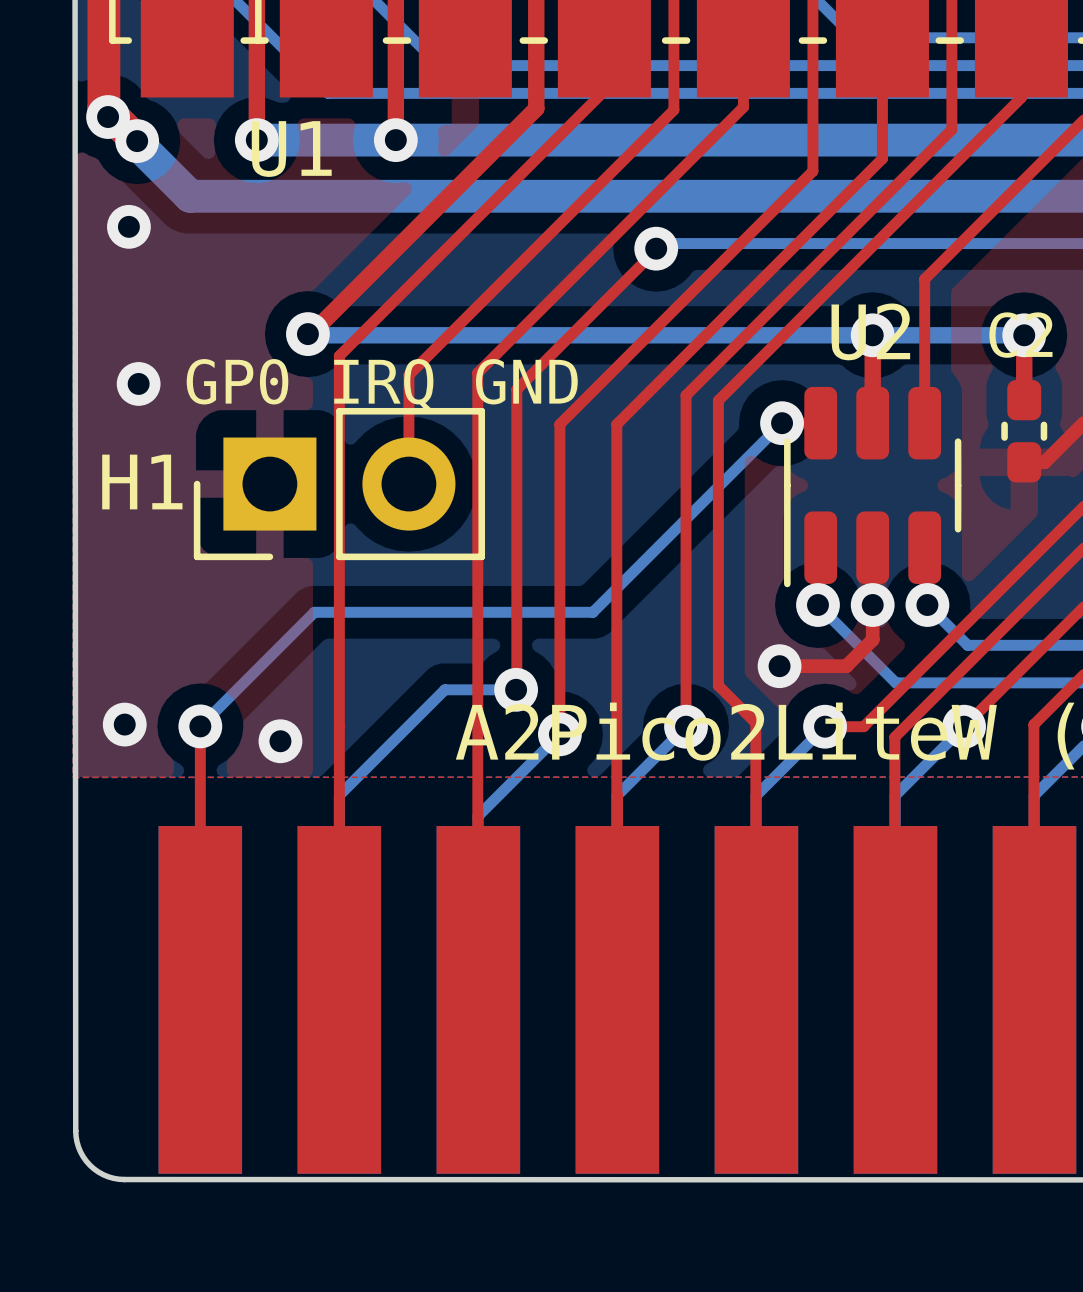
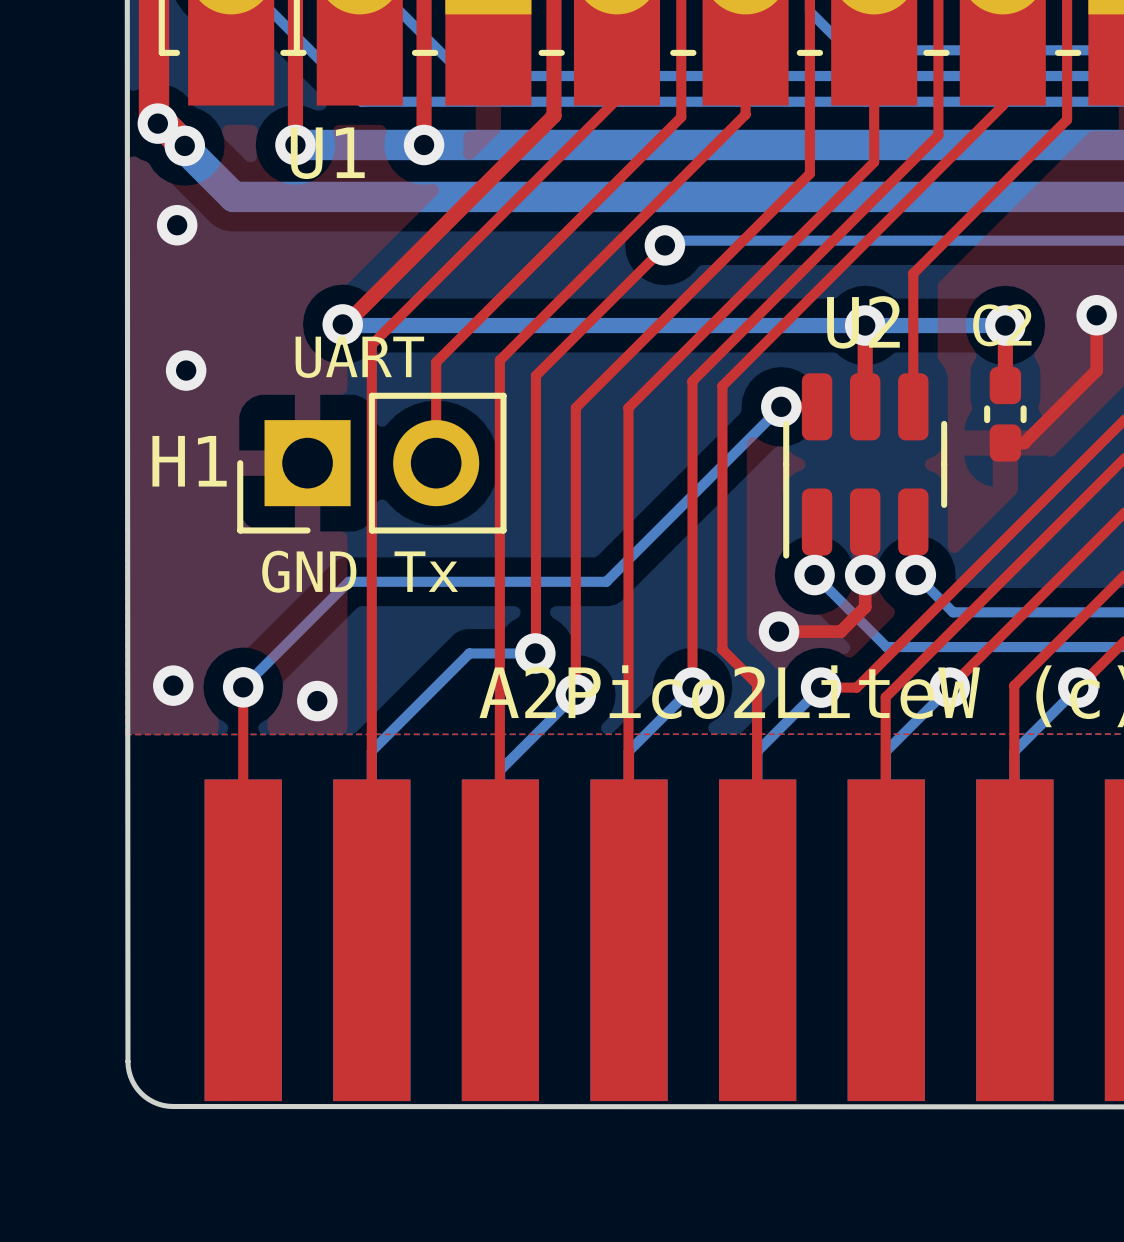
text: none -> UART (359, 357)
text: GP0 IRQ GND (382, 385) -> none
text: none -> GND Tx (360, 571)

